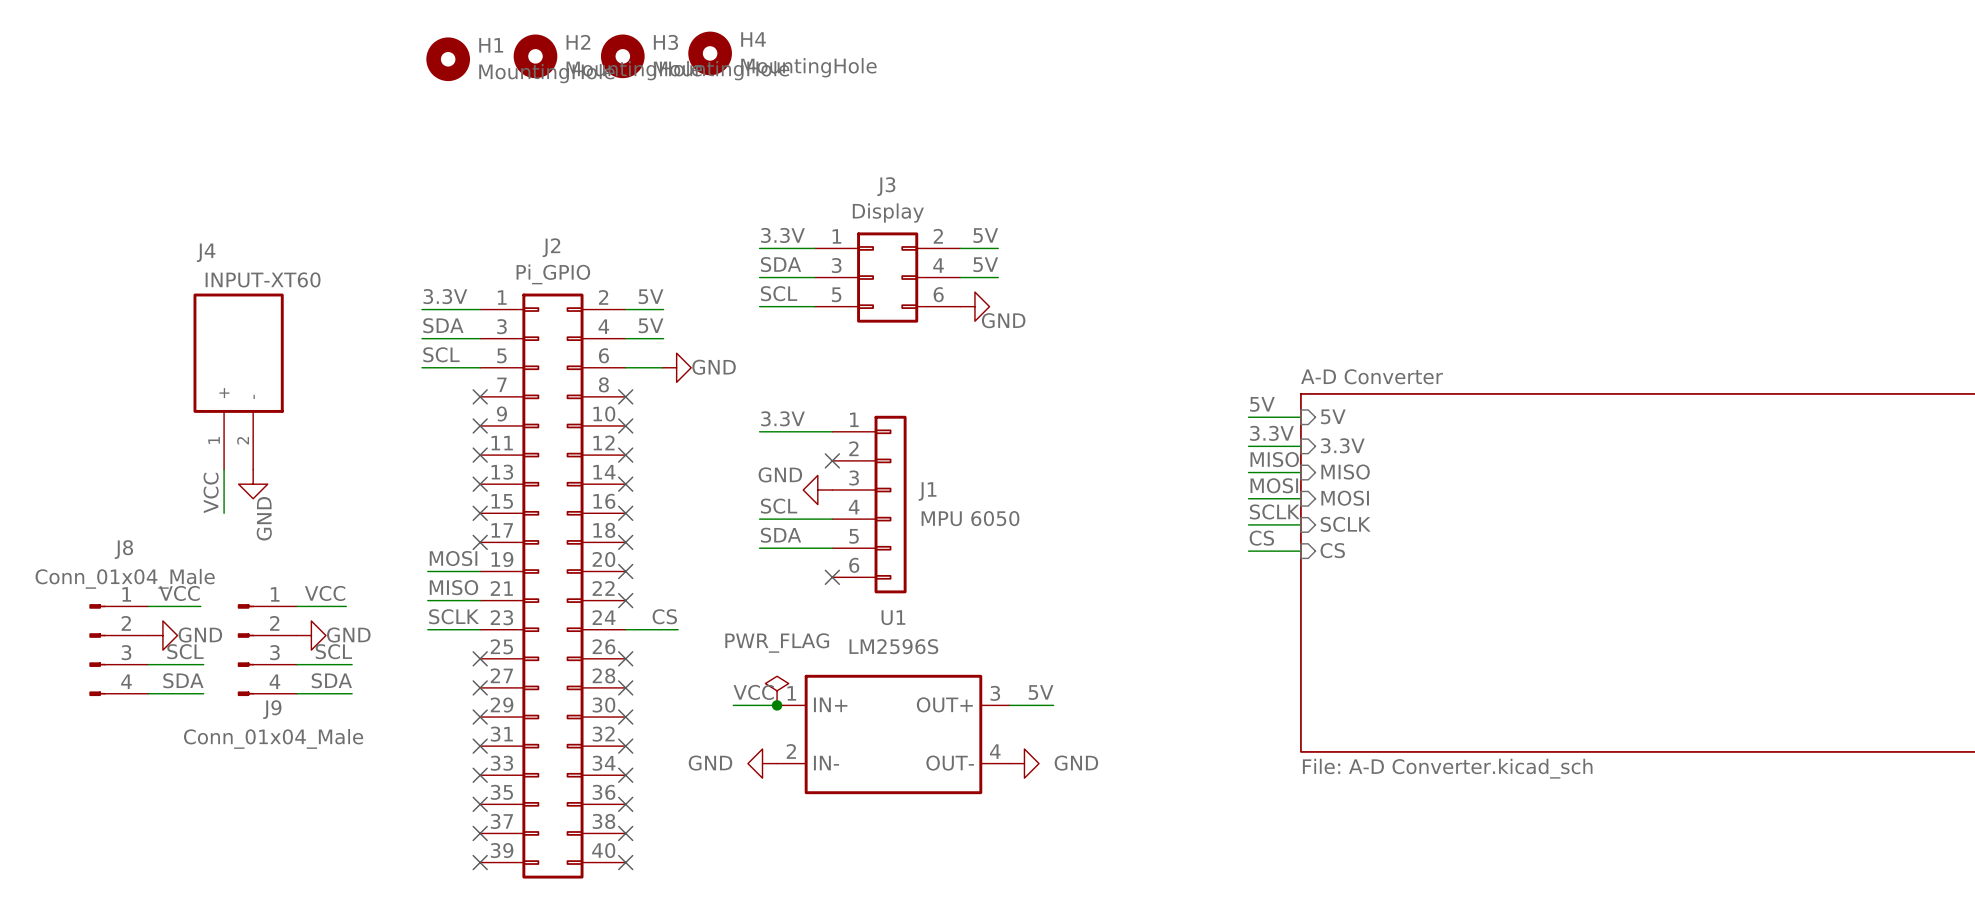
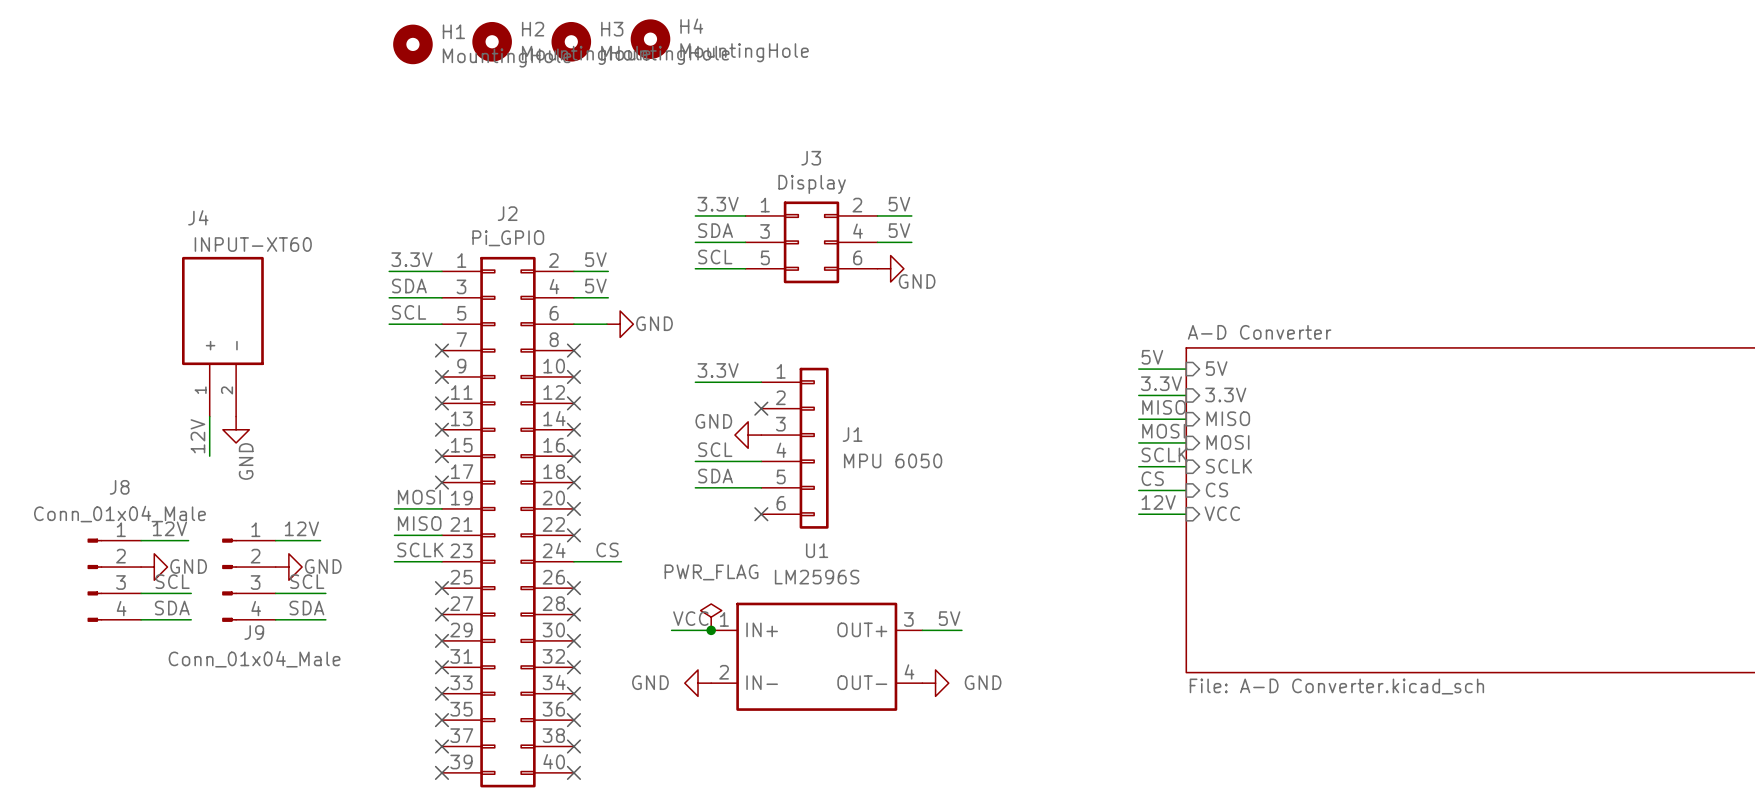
label: VCC (211, 492) -> 12V (197, 436)
label: none -> 12V (1158, 502)
sheet pin: none -> VCC (1222, 513)
wire: none -> (1138, 514) (1186, 514)
label: VCC (179, 593) -> 12V (169, 528)
label: VCC (325, 593) -> 12V (301, 528)

